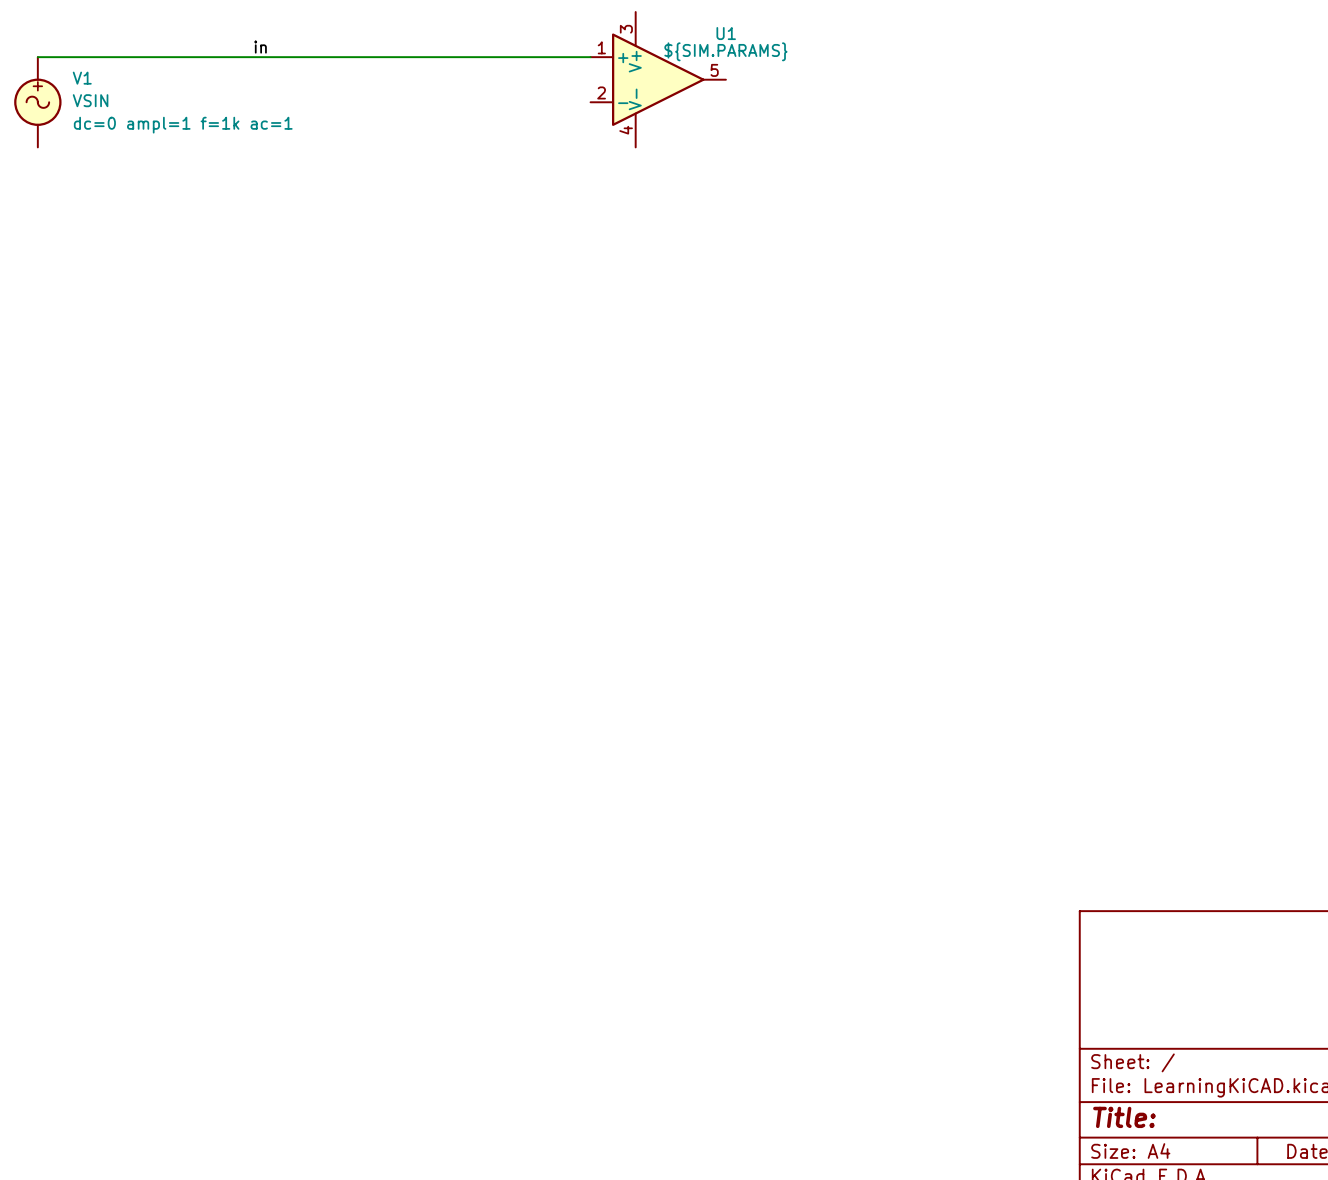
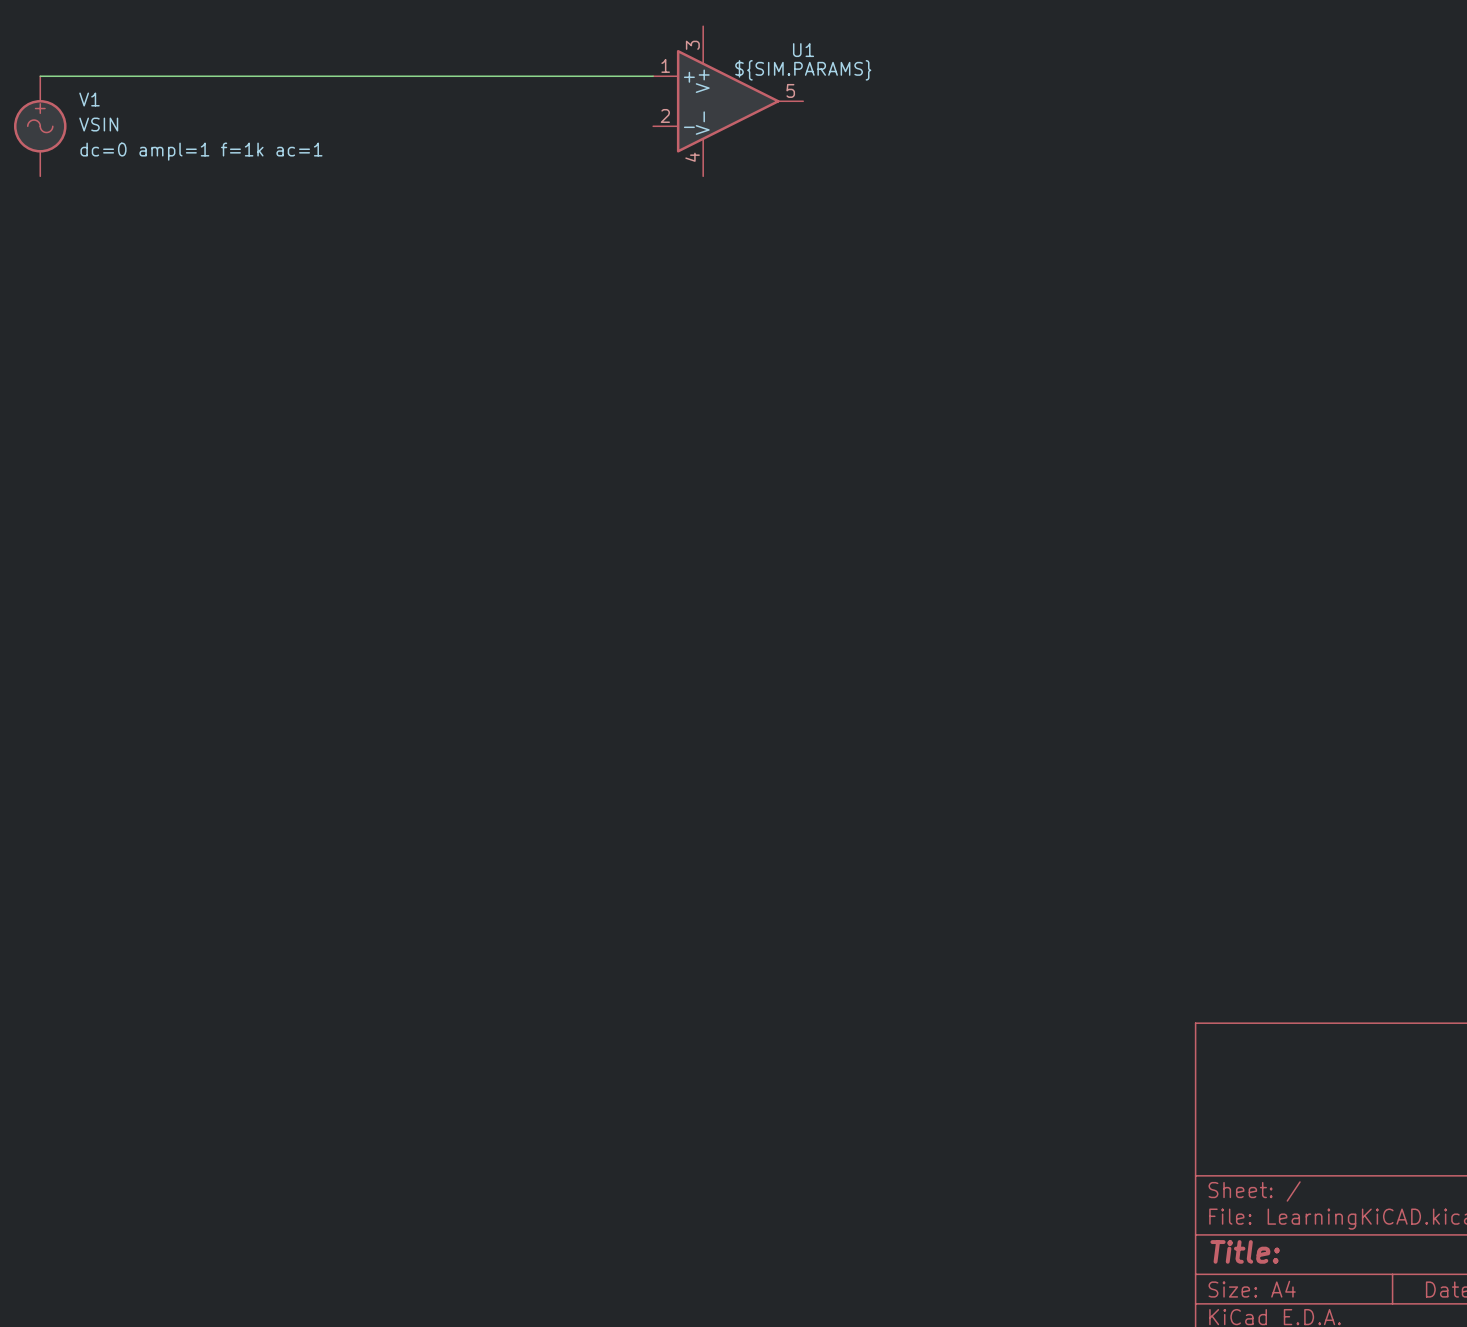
label: in (260, 47) -> none

